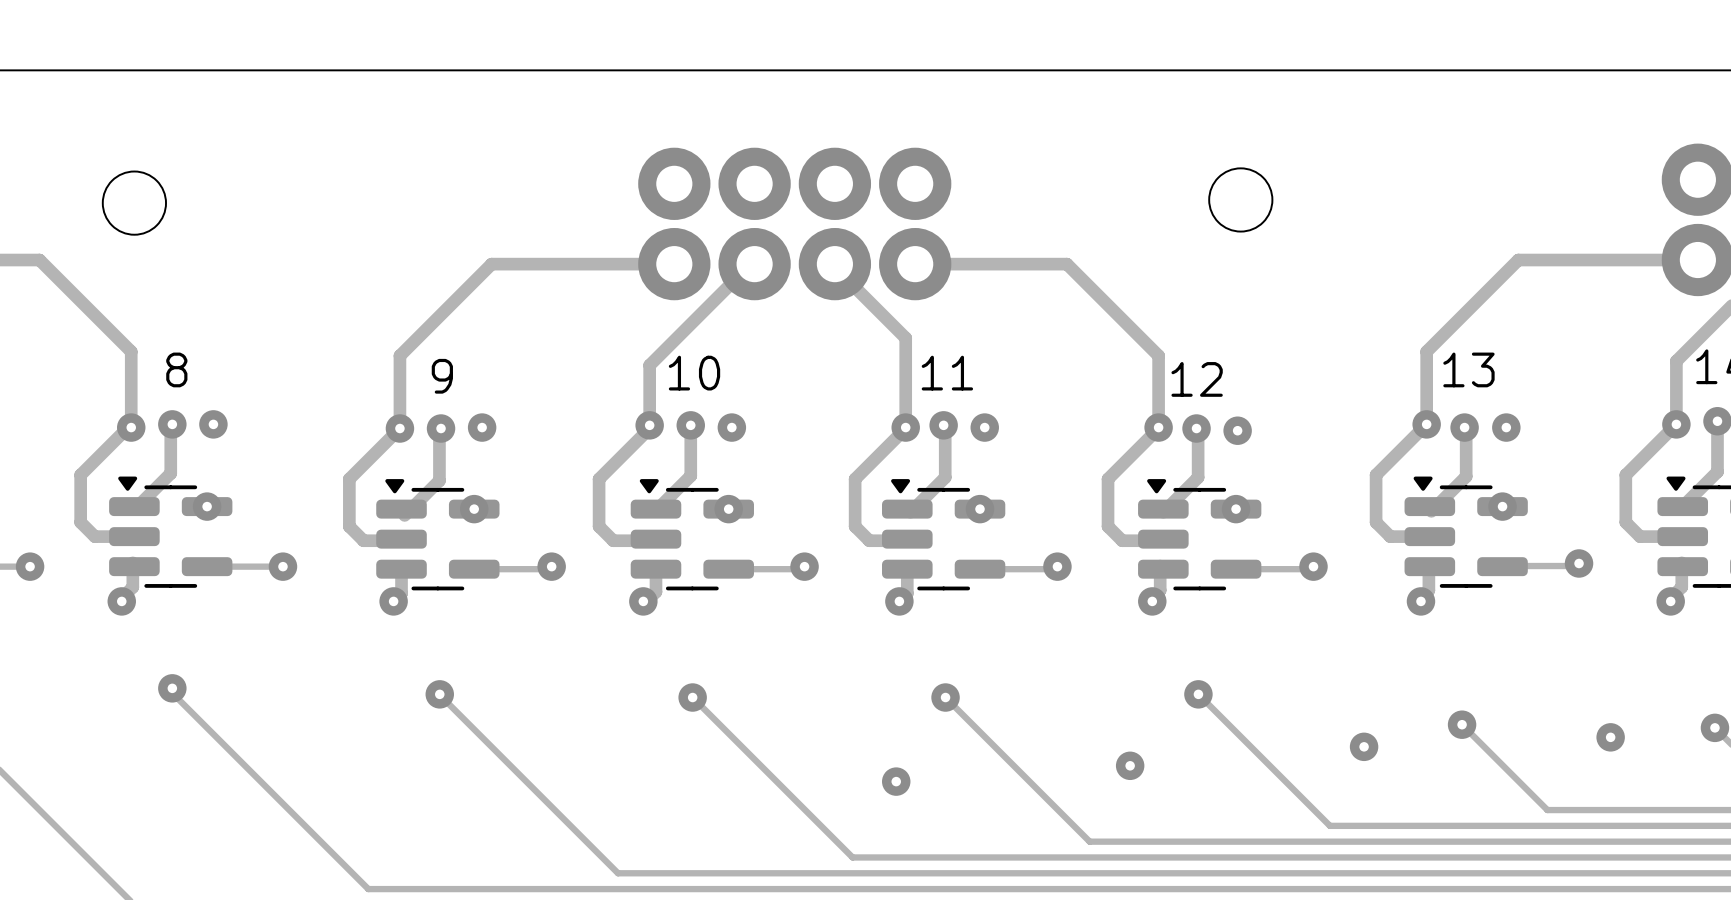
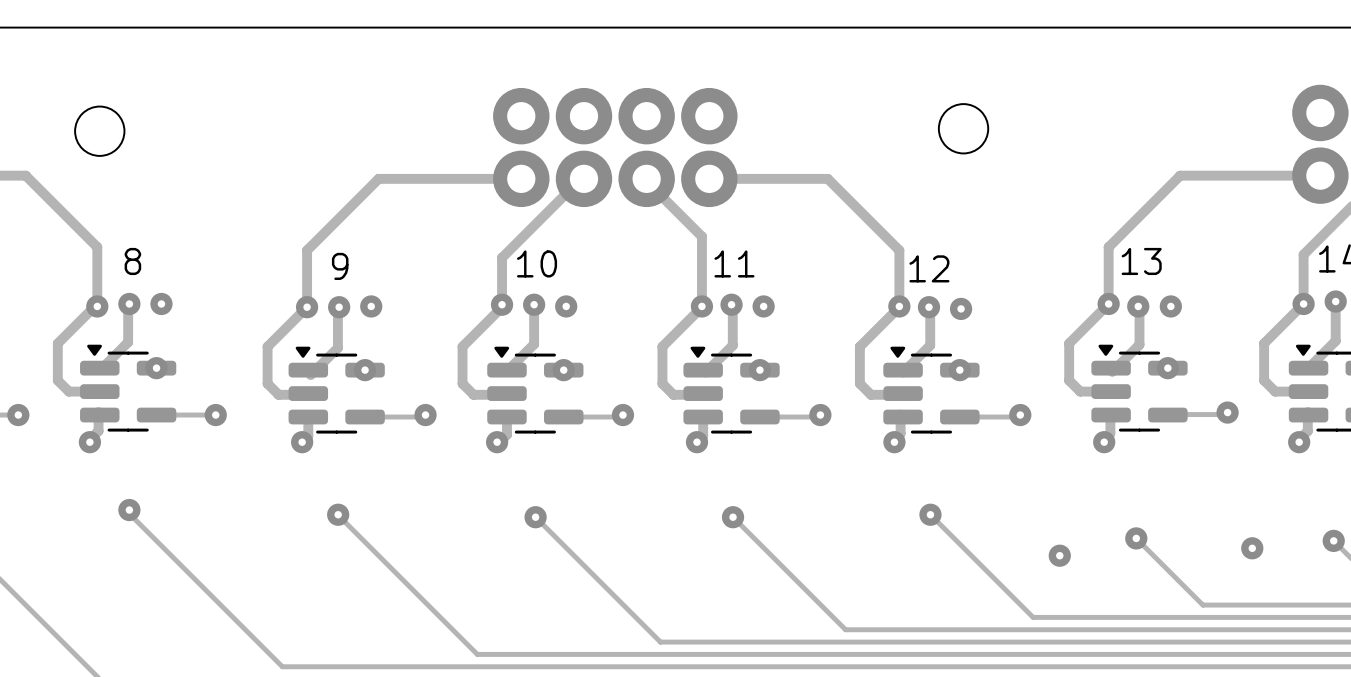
via: (1130, 765) -> none
via: (896, 781) -> none

